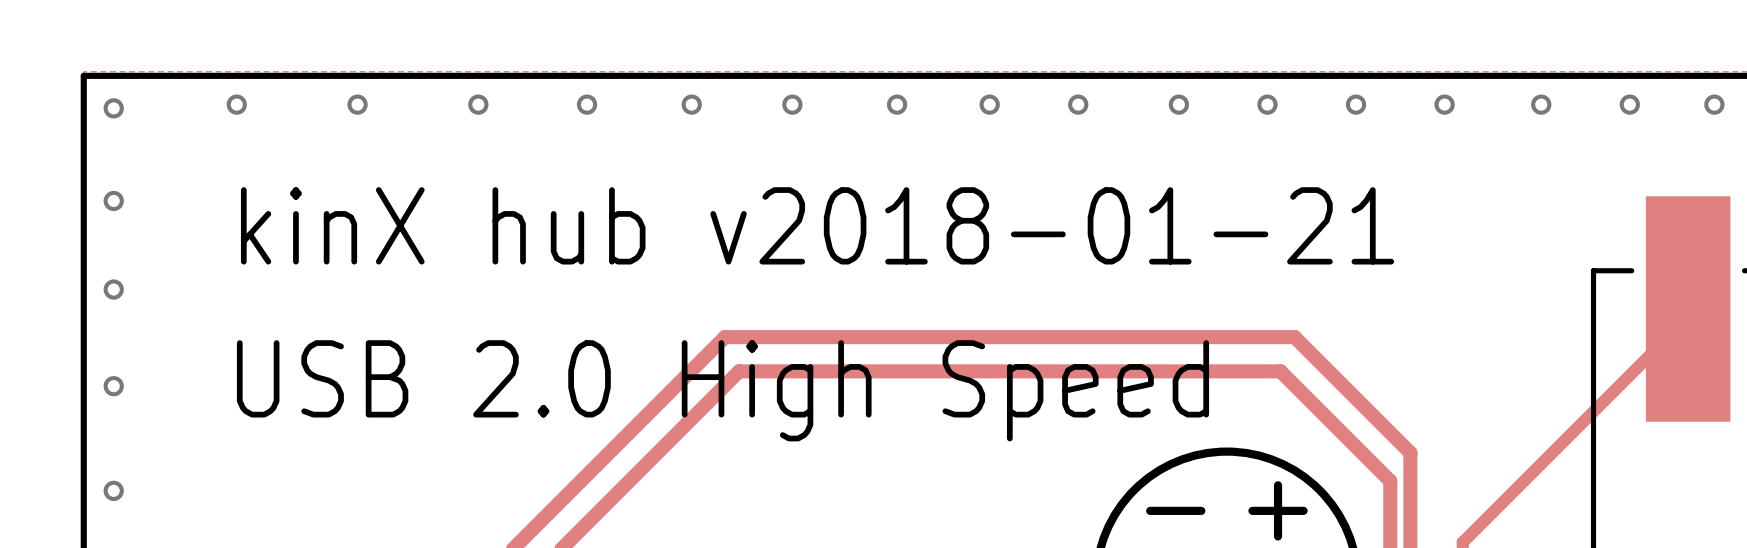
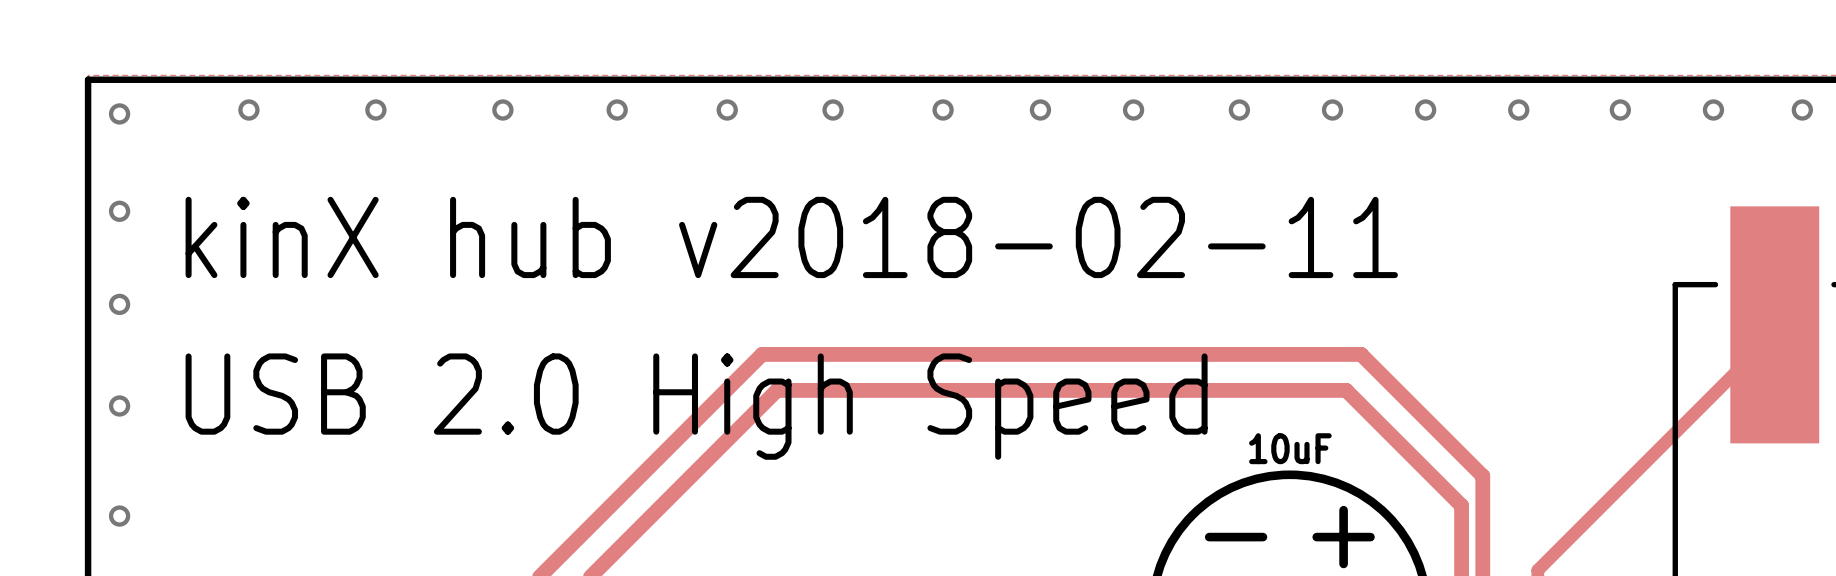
text: kinX hub v2018-01-21 (817, 225) -> kinX hub v2018-02-11 (791, 237)
text position: USB 2.0 High Speed (722, 390) -> USB 2.0 High Speed (696, 406)
part value: none -> 10uF (1290, 448)

